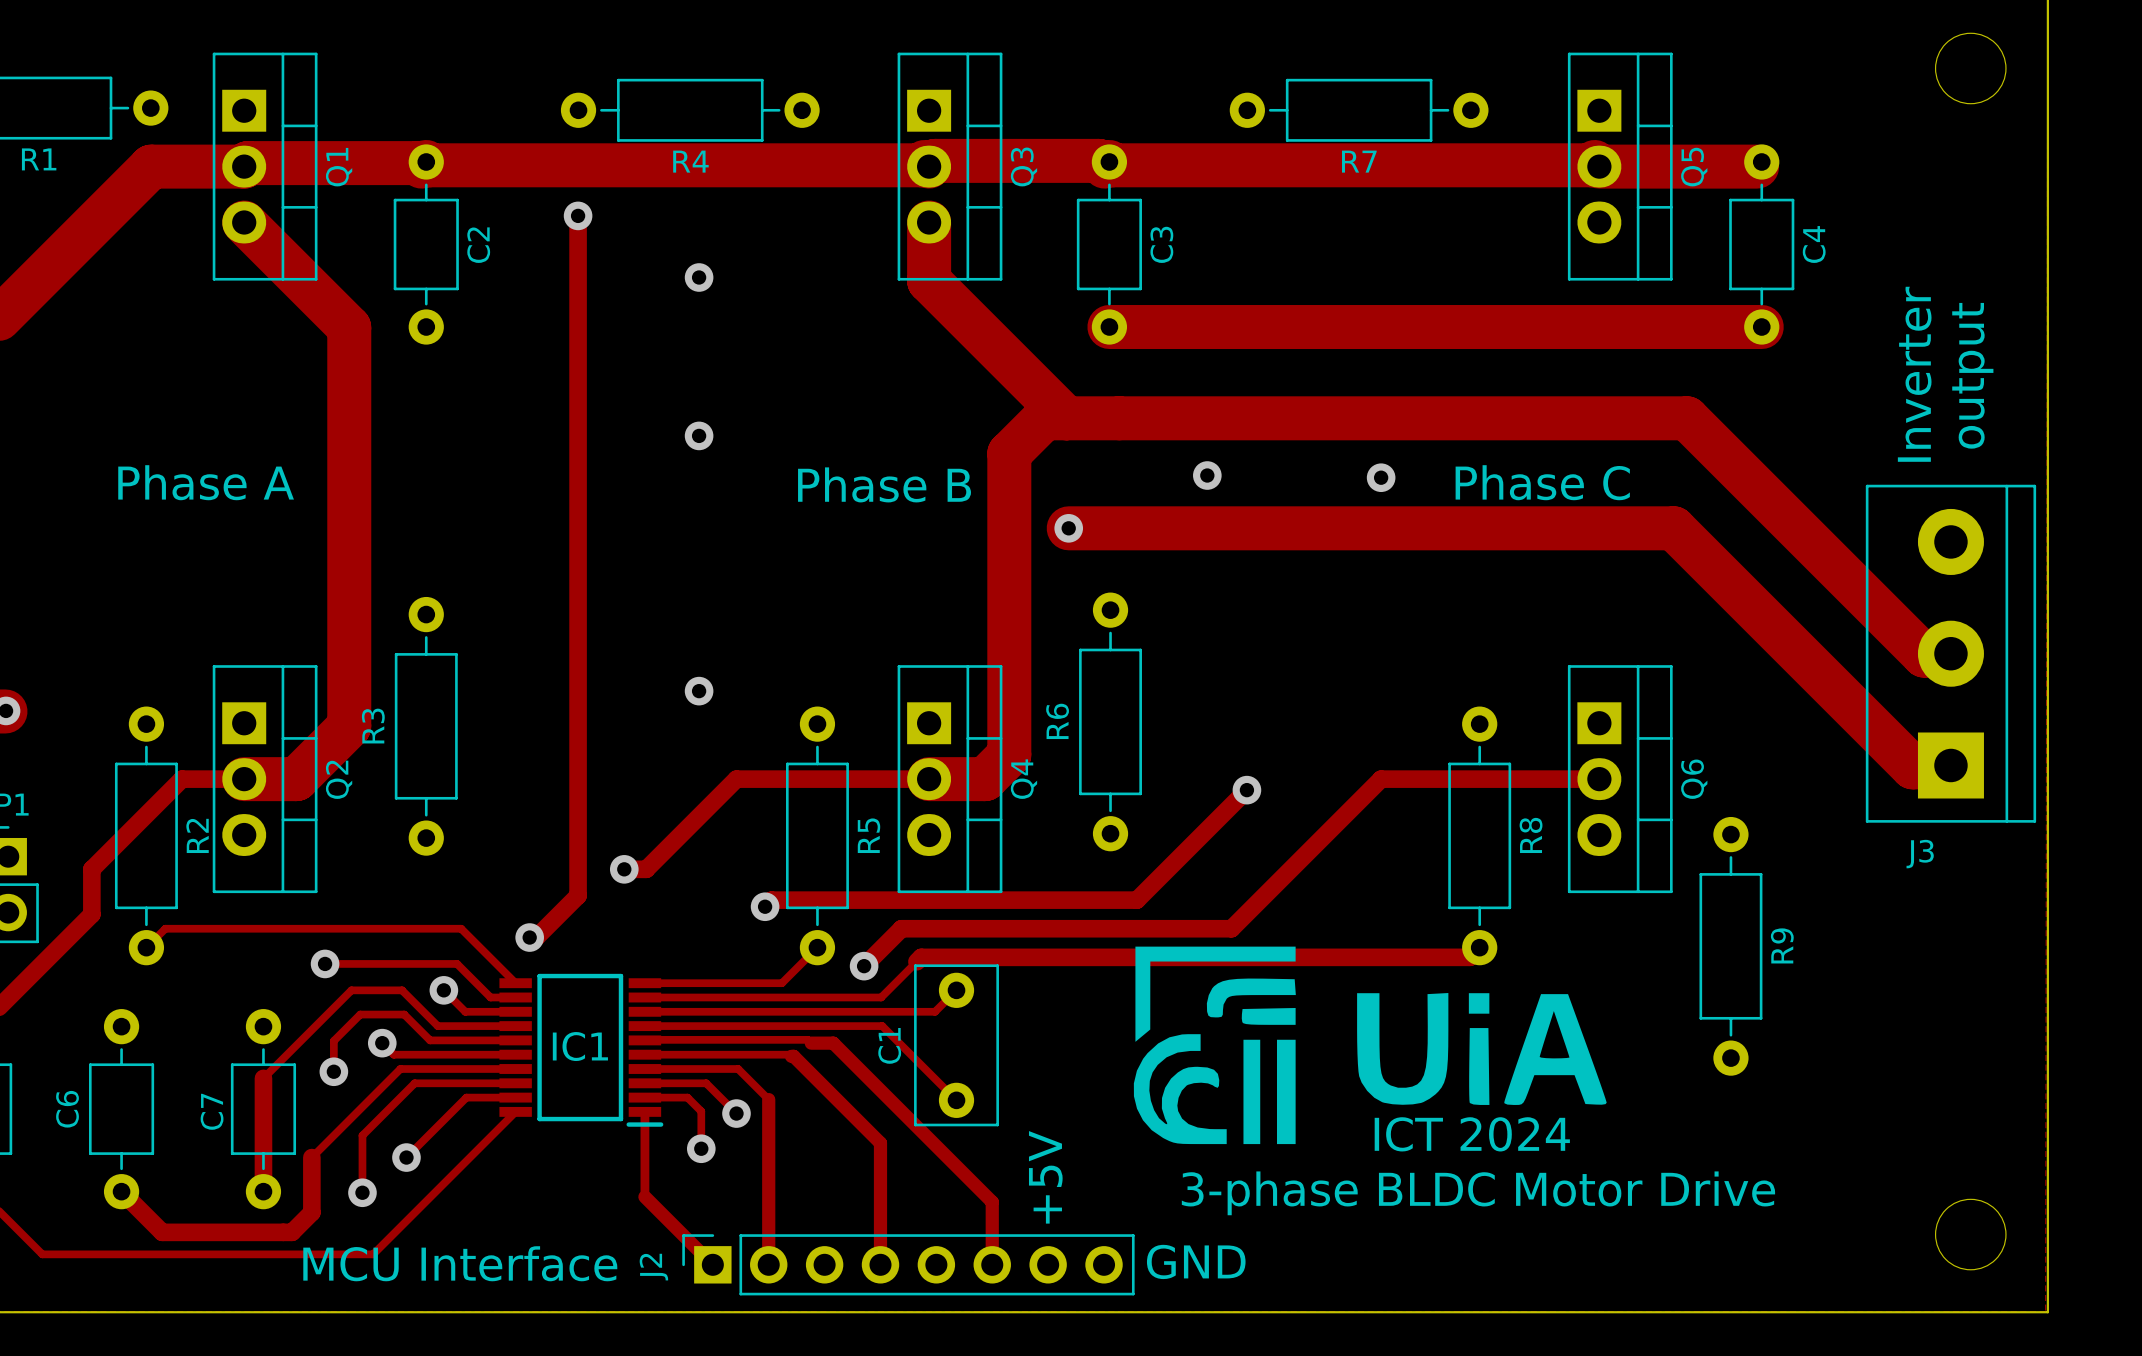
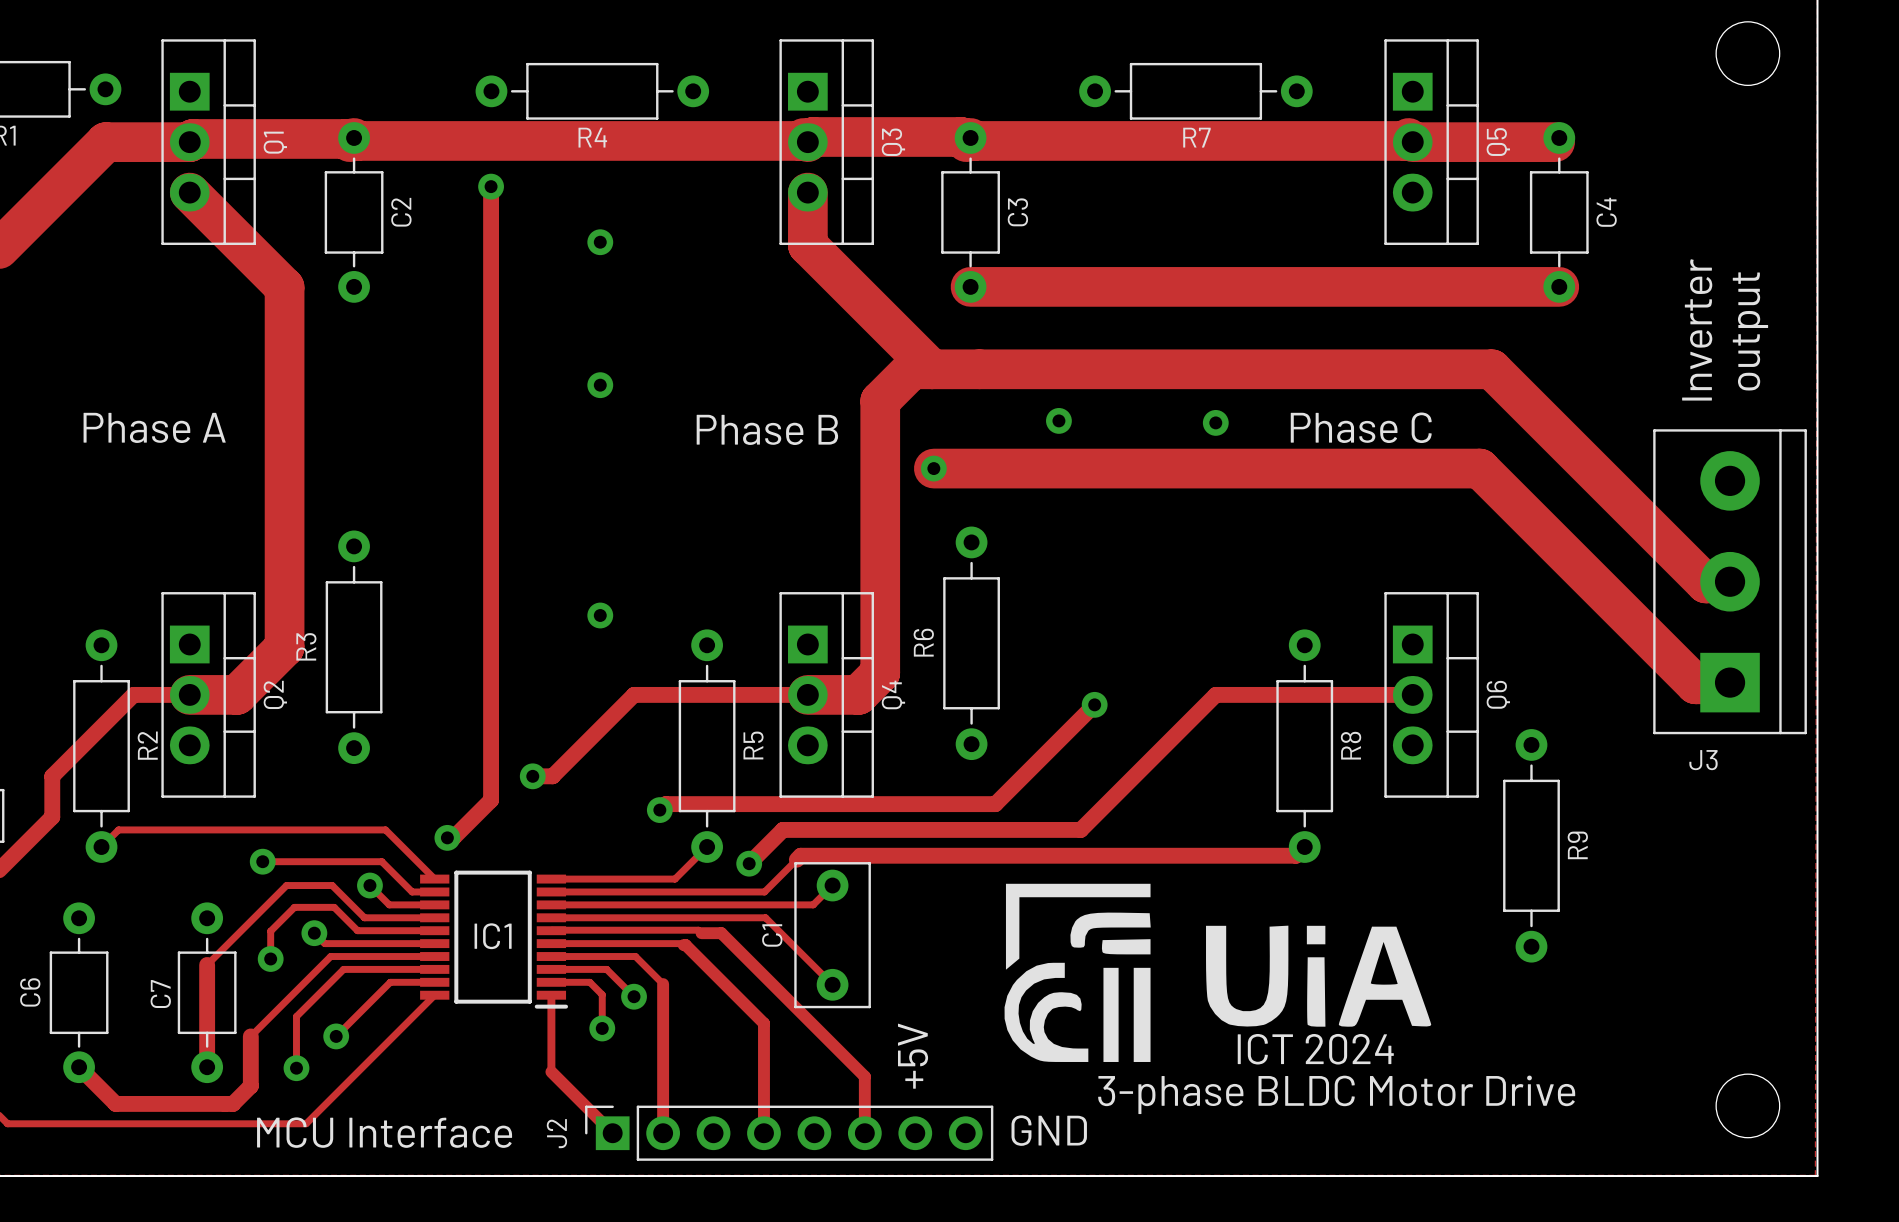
drawing position: (1370, 1045) -> (1217, 972)
text position: ICT 2024 (1472, 1134) -> ICT 2024 (1315, 1049)
text position: 3-phase BLDC Motor Drive (1478, 1193) -> 3-phase BLDC Motor Drive (1336, 1094)

